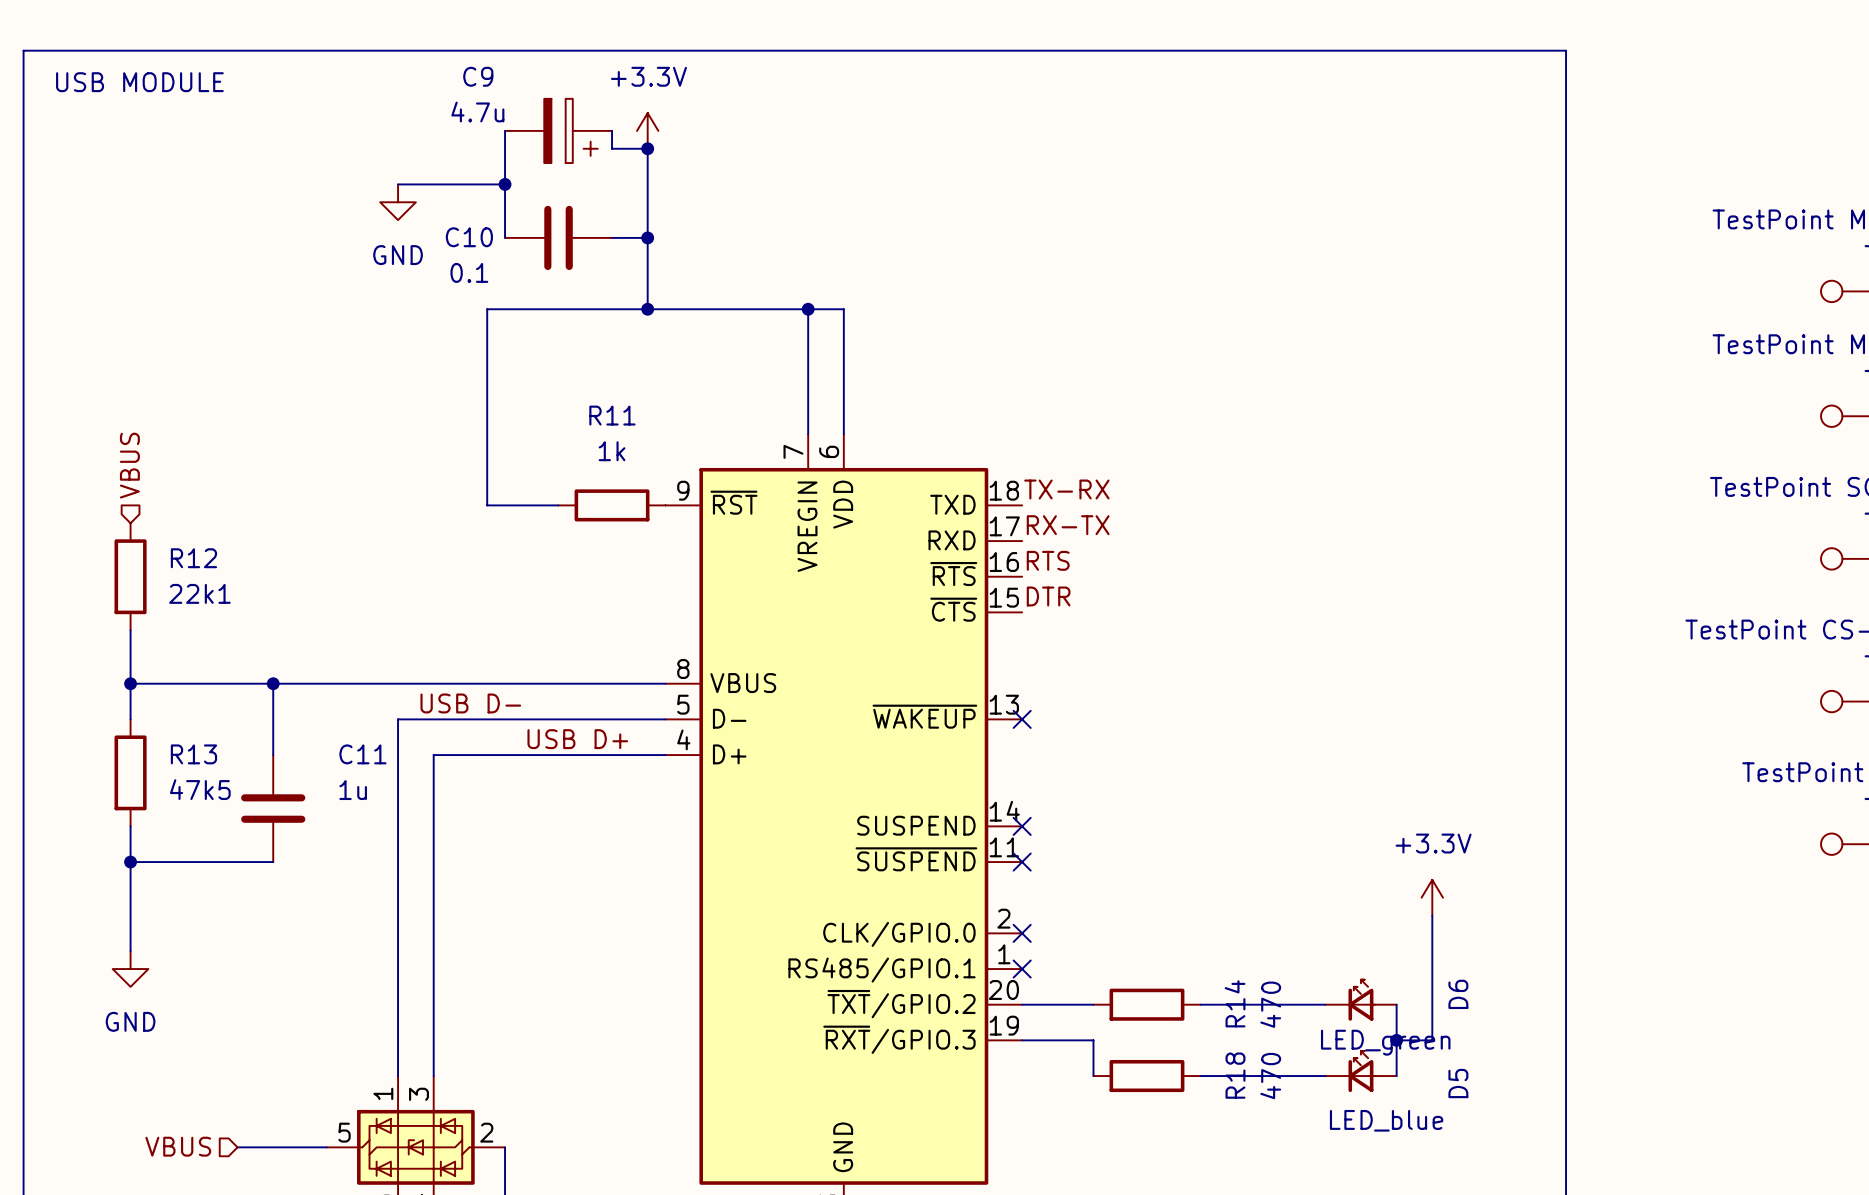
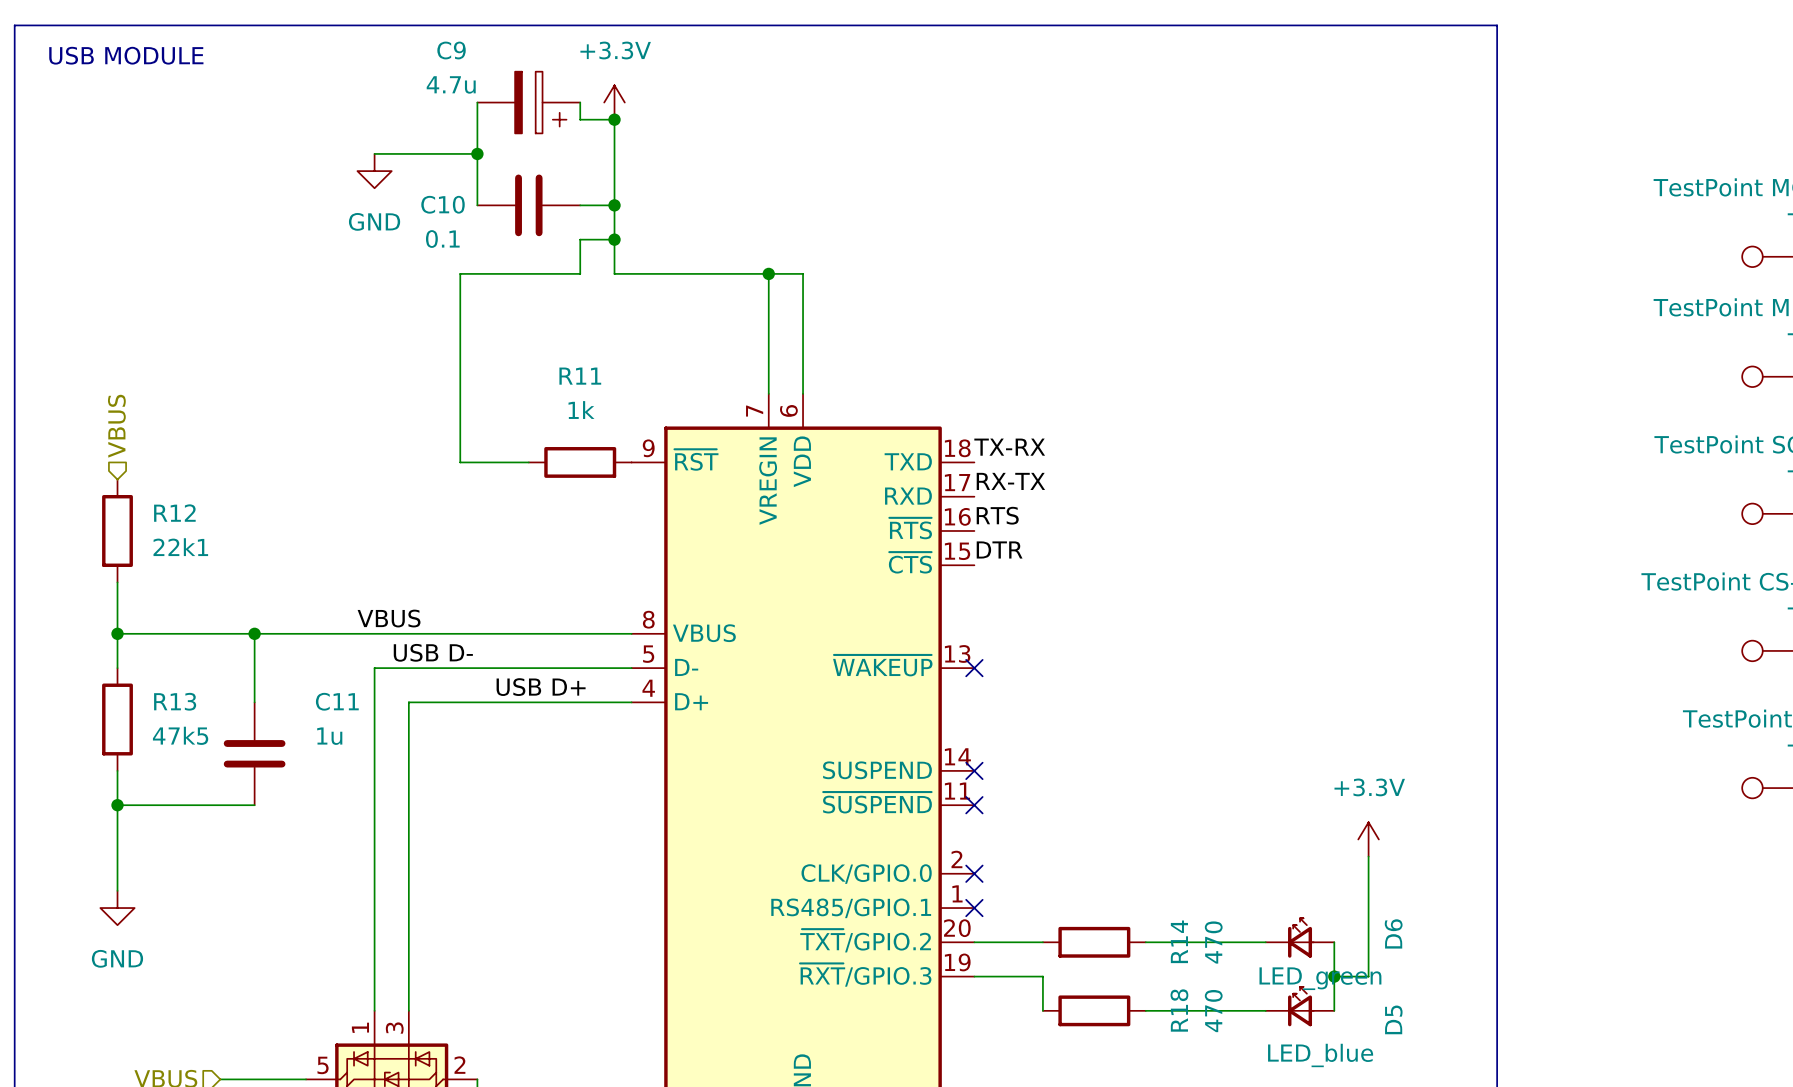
wire: (612, 309) (647, 309) -> (580, 273) (580, 239) (614, 239)
junction position: (647, 309) -> (614, 239)
label: none -> VBUS (389, 618)

